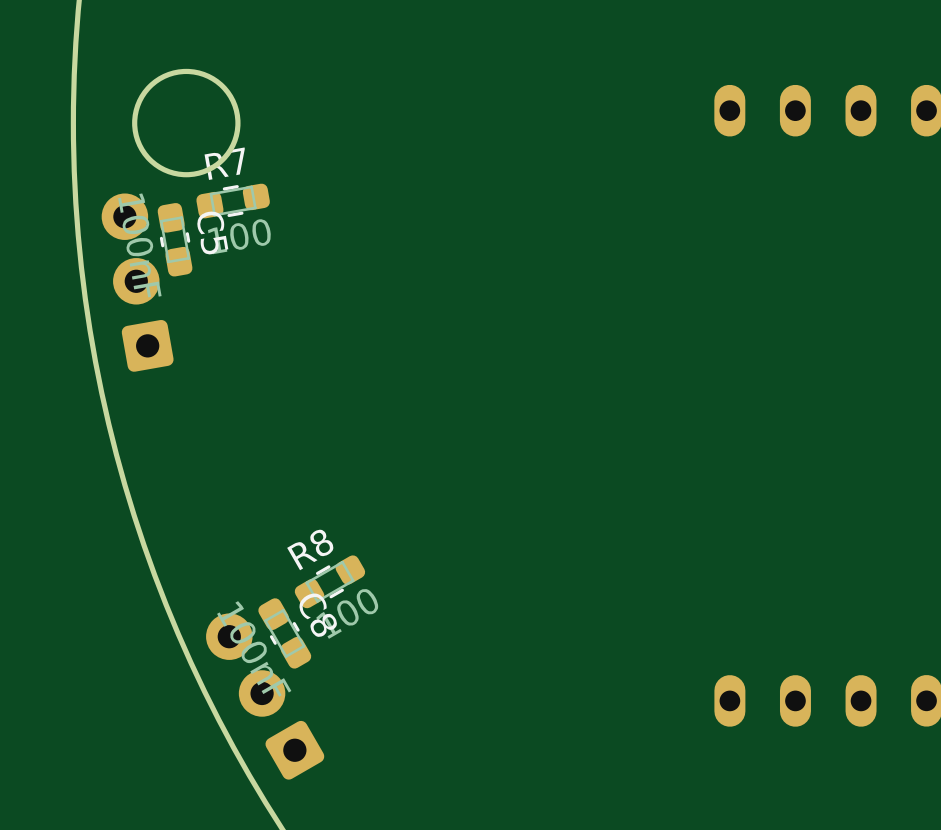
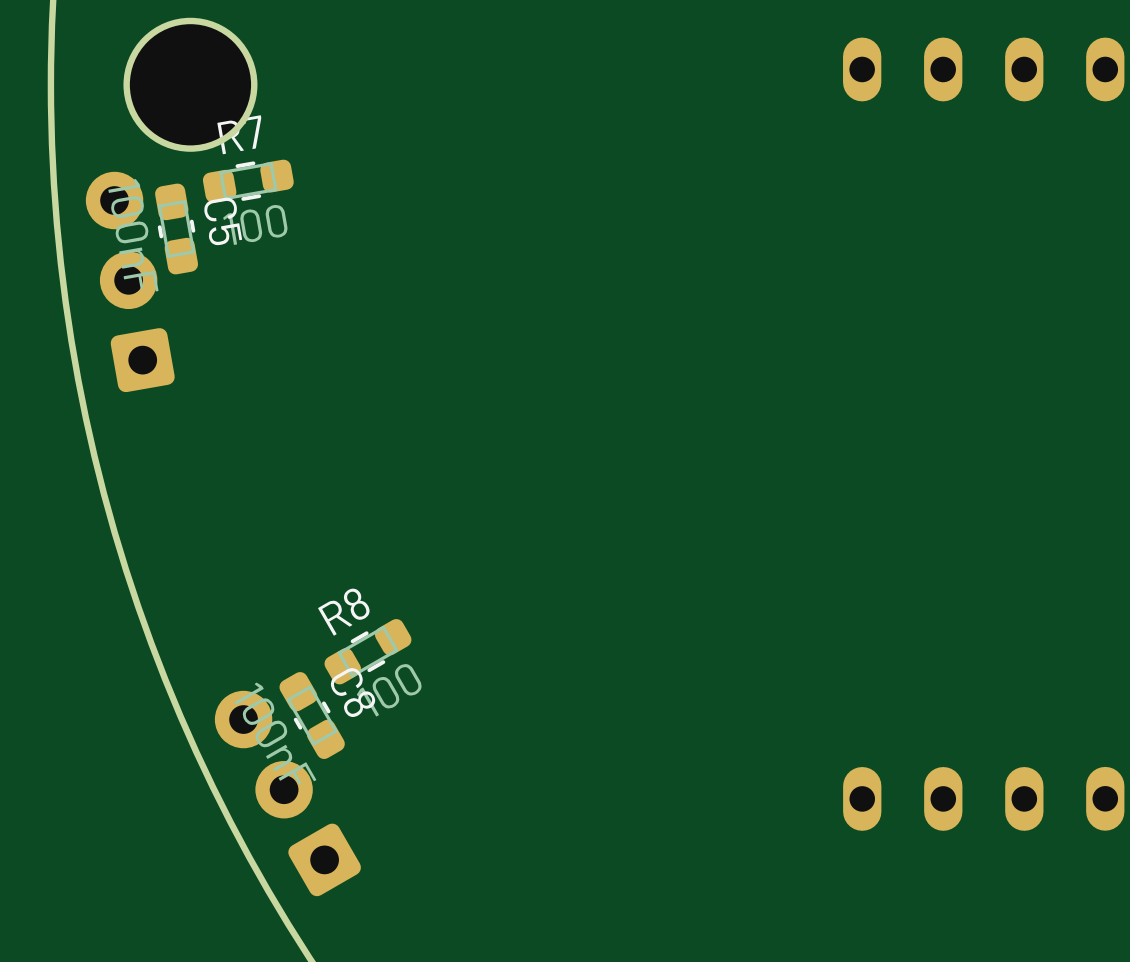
part: none -> (190, 85)

